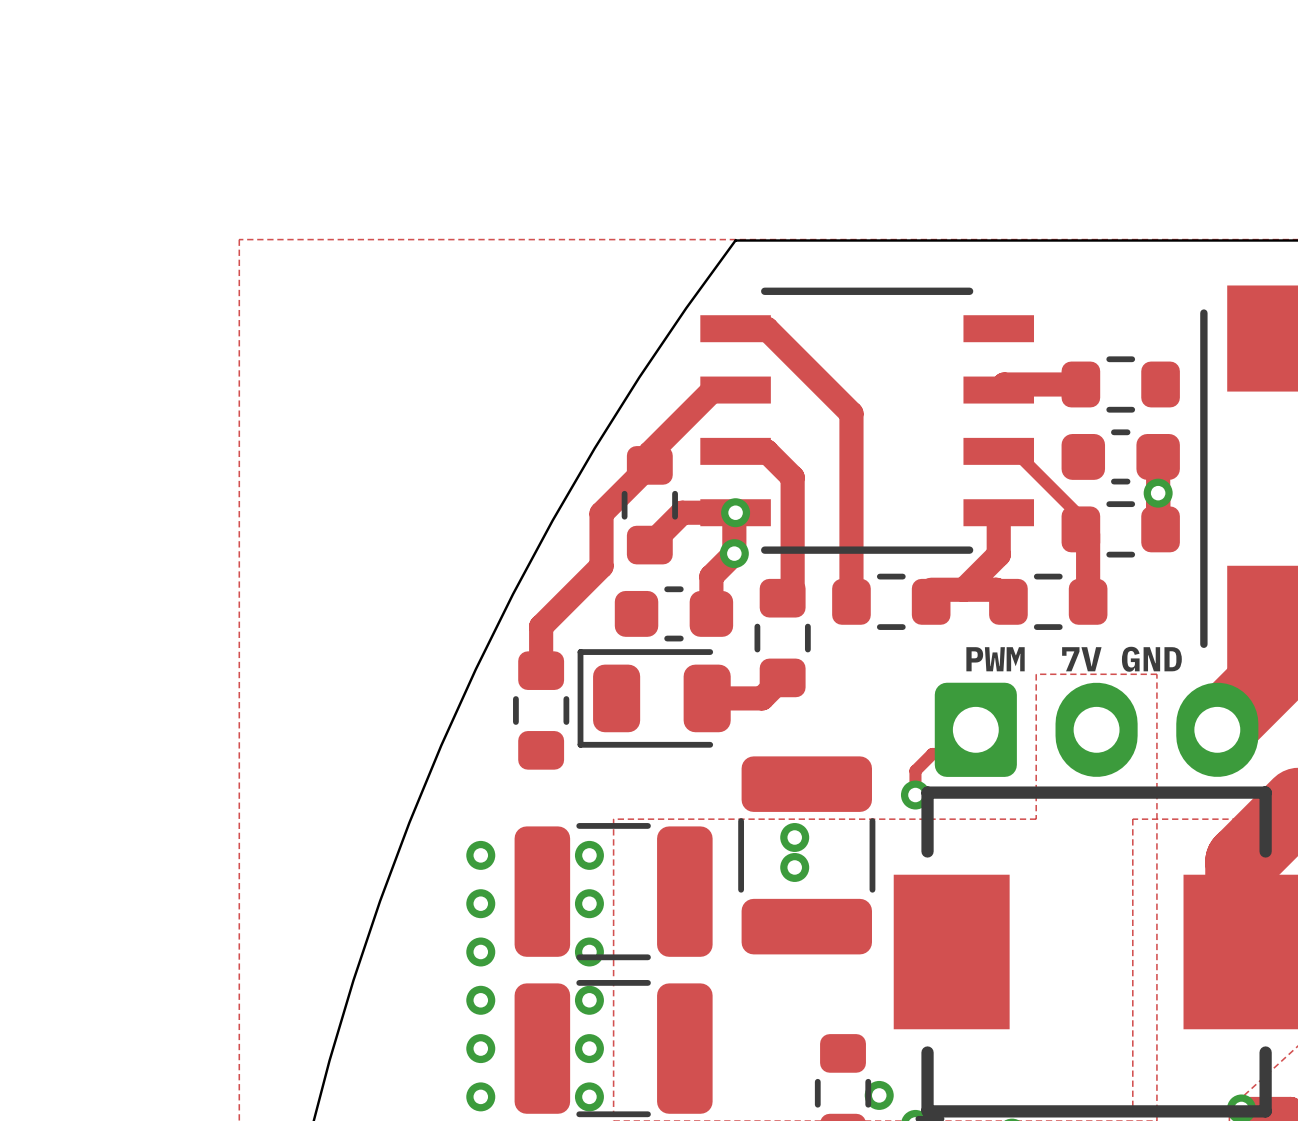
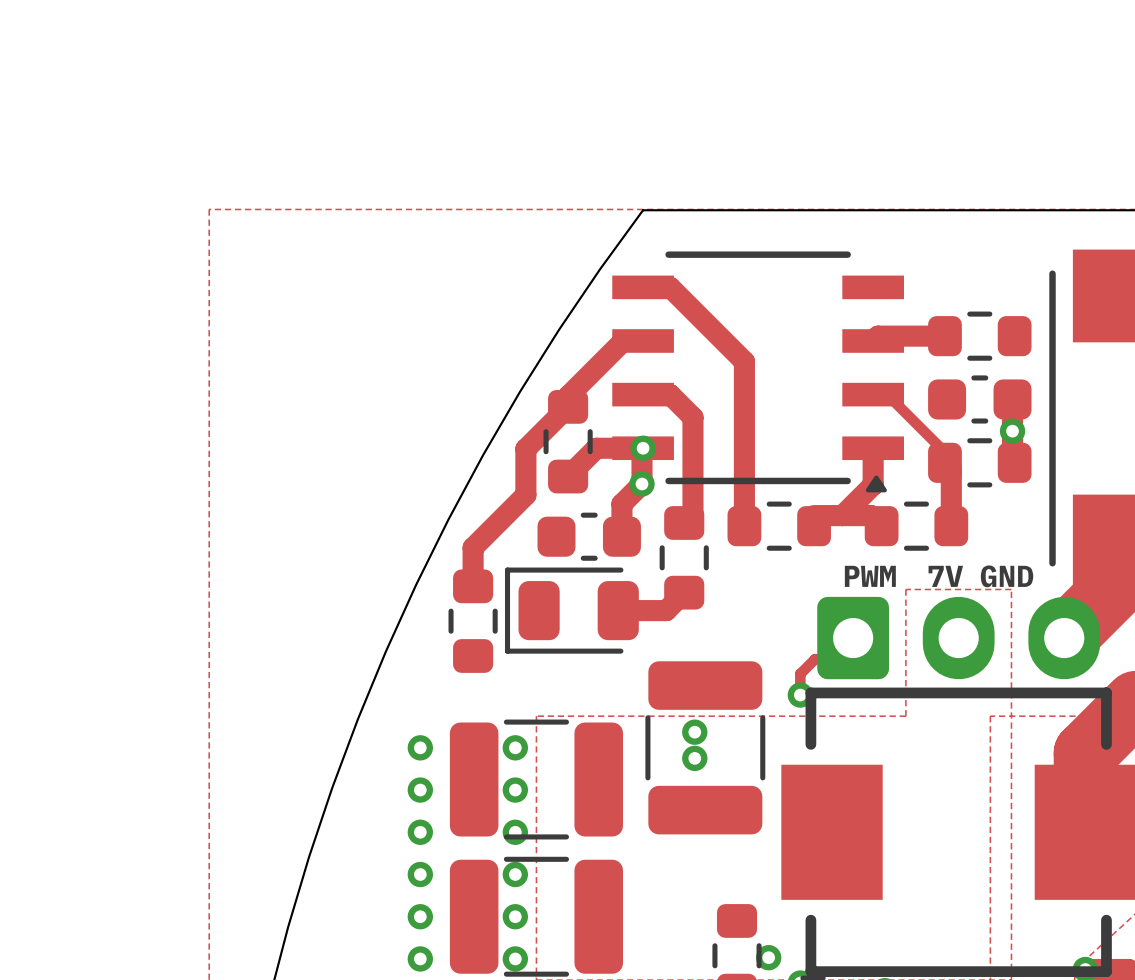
part footprint: [700, 287, 1035, 554] -> [612, 251, 904, 493]

